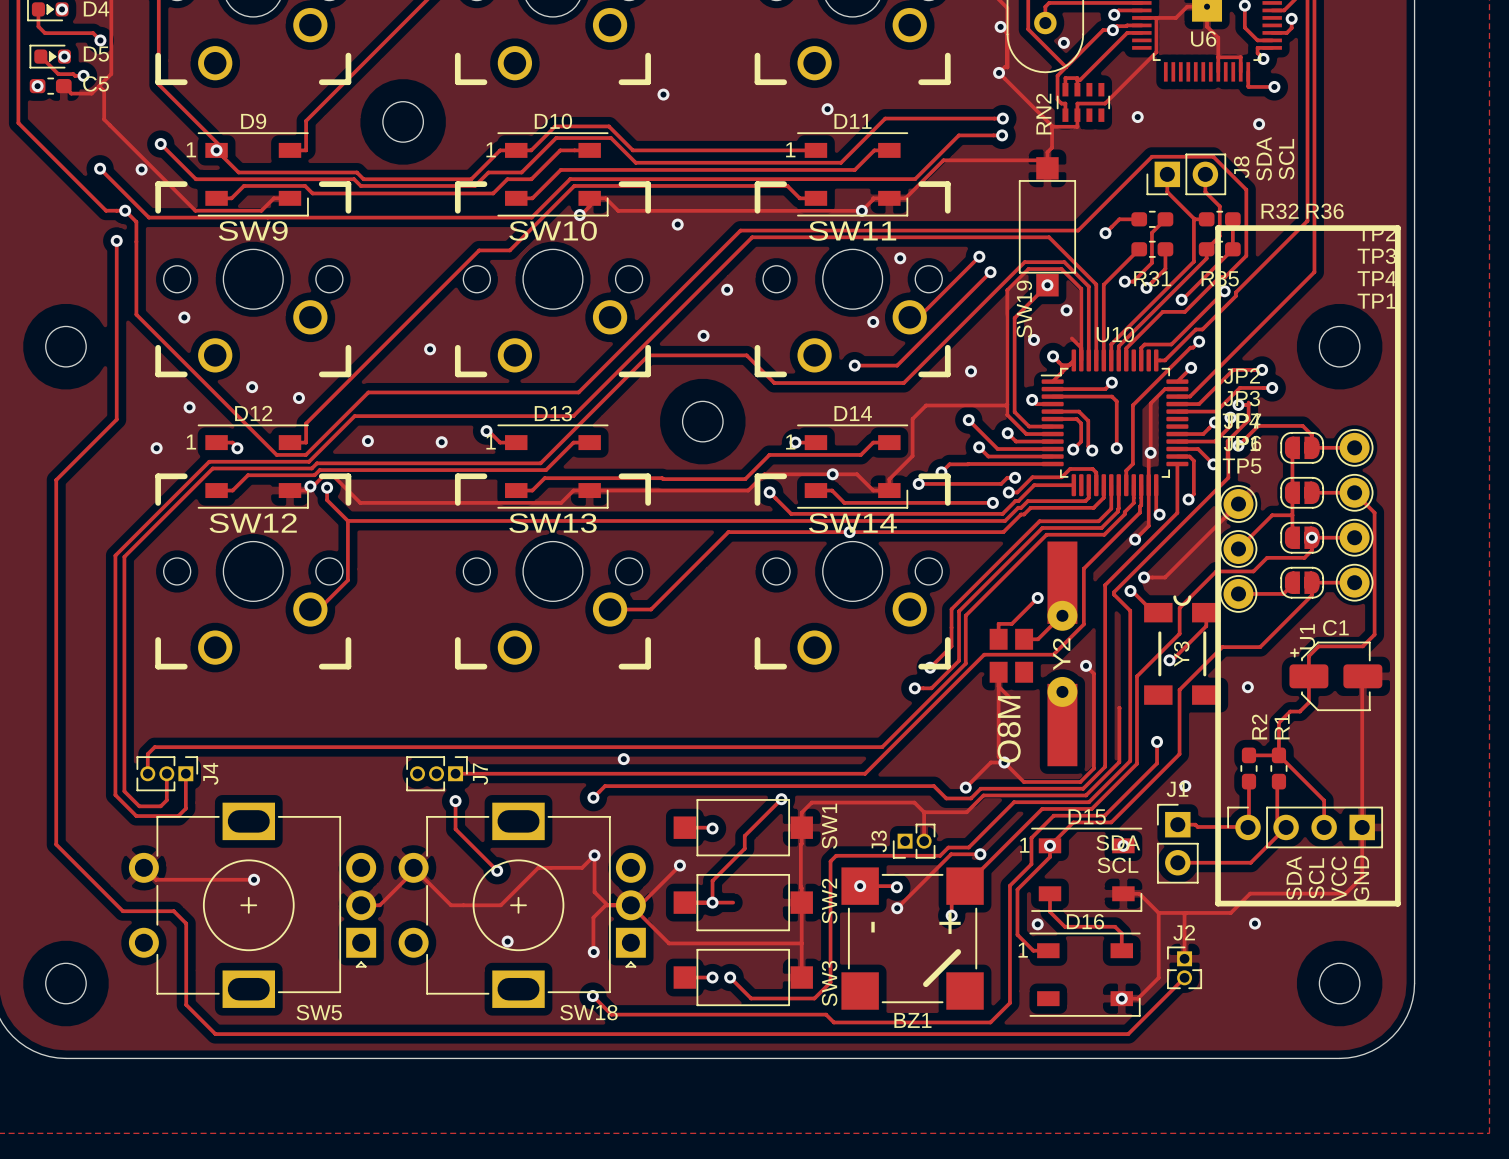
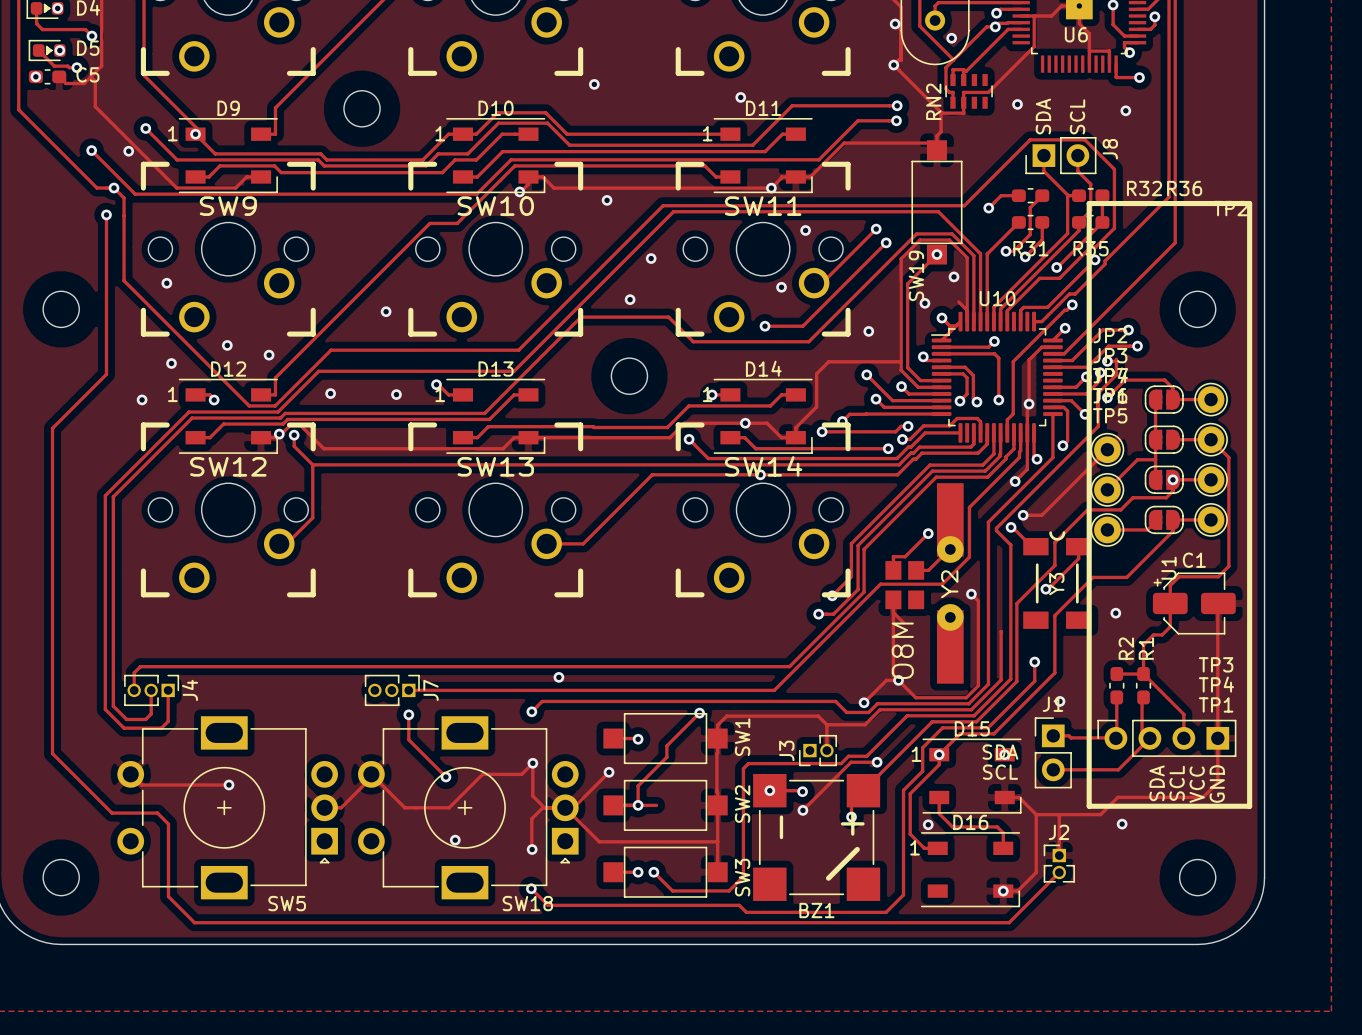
J8 text position: SDA (1264, 158) -> SDA (1043, 116)
J8 text position: SCL (1286, 159) -> SCL (1077, 116)
TP3 name position: TP3 (1376, 256) -> TP3 (1216, 664)
TP4 name position: TP4 (1377, 278) -> TP4 (1216, 684)
TP1 name position: TP1 (1376, 301) -> TP1 (1216, 704)

